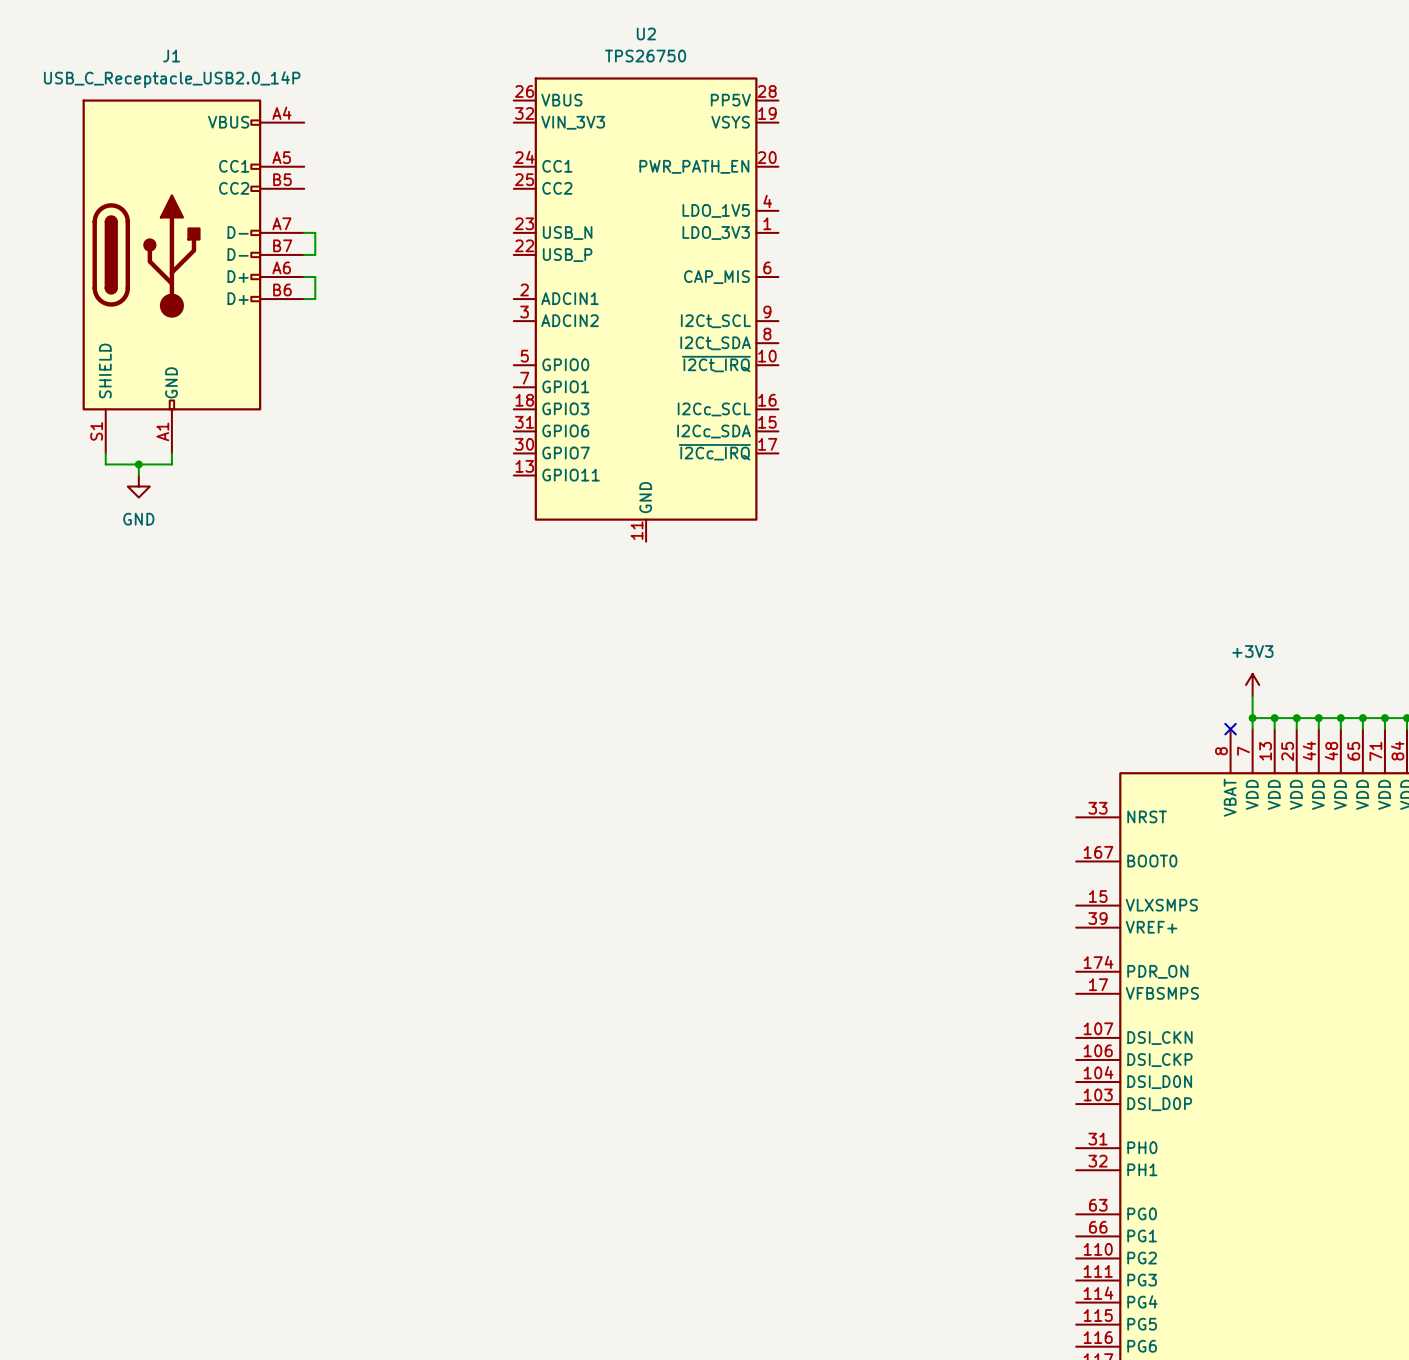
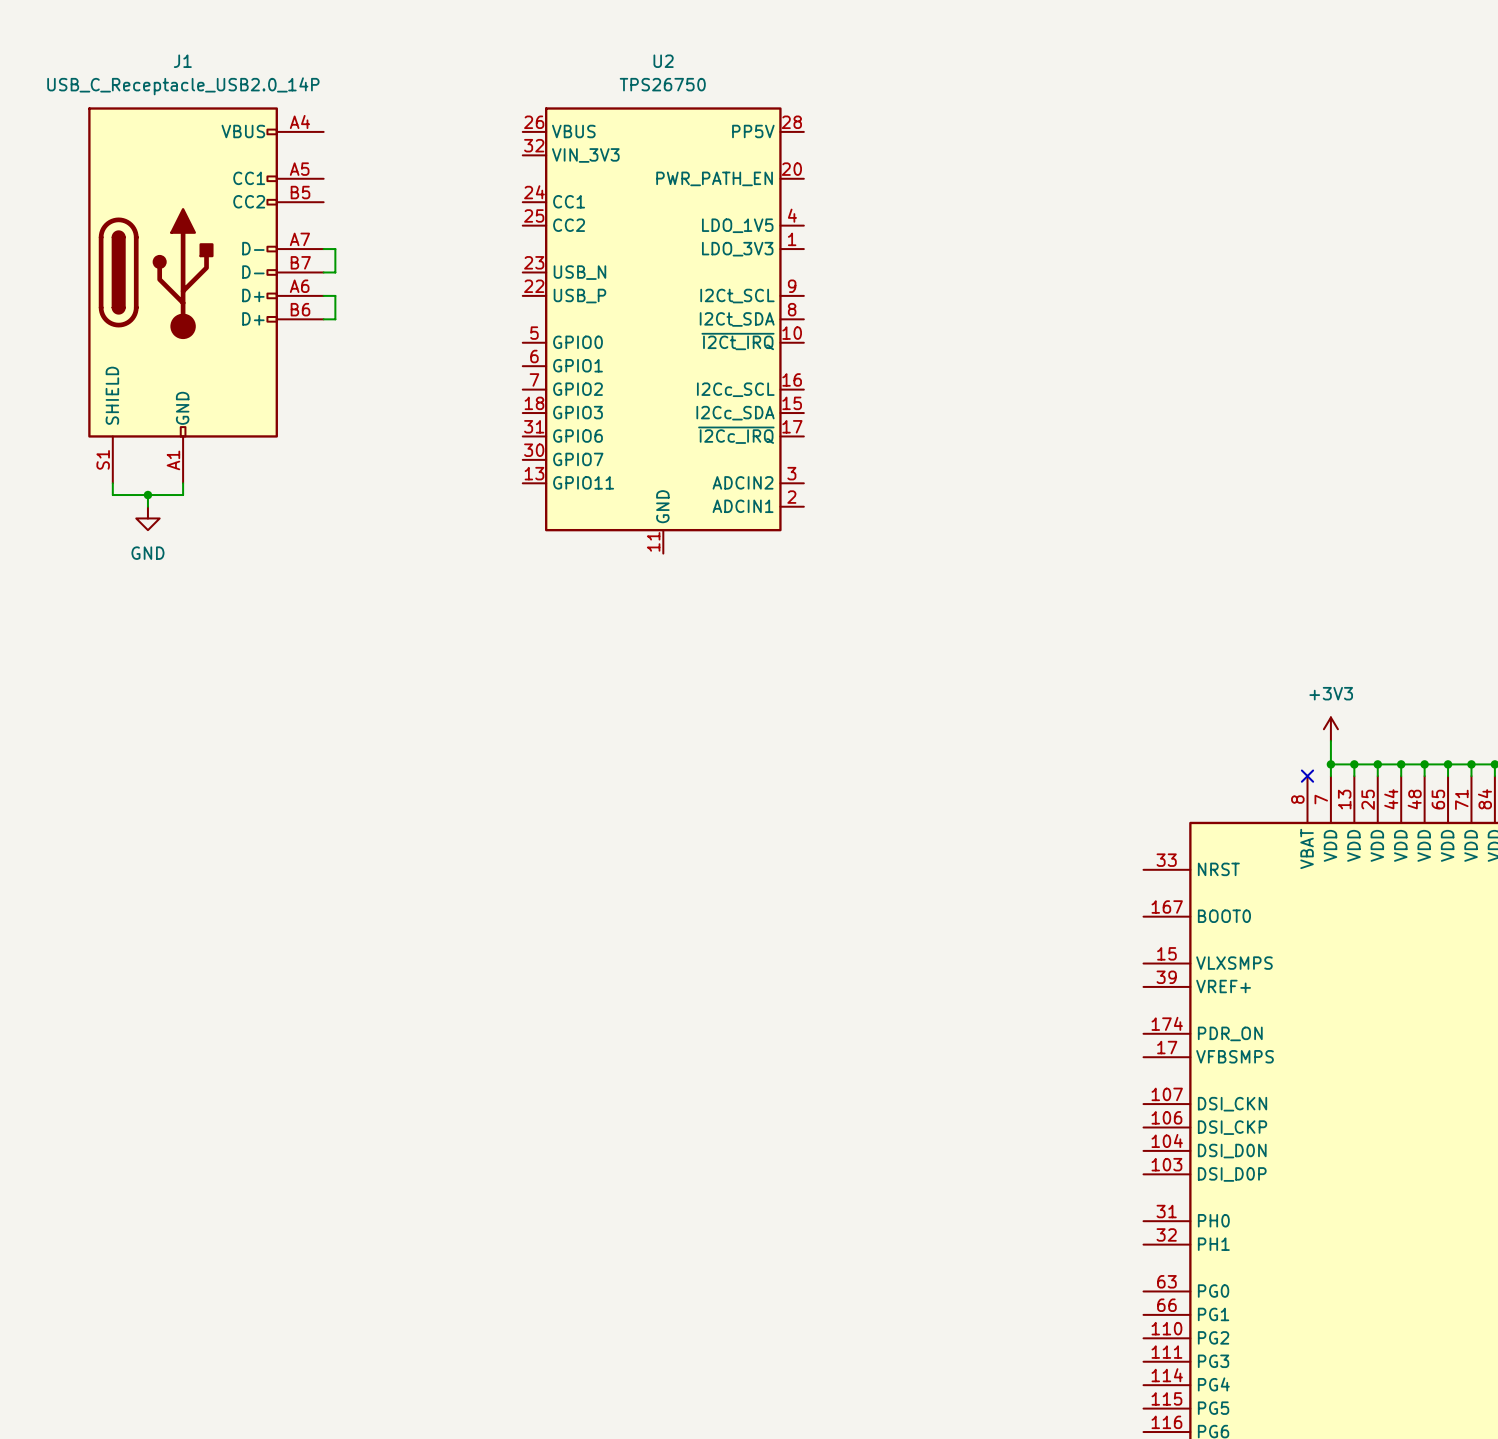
U2 name position: U2 (646, 33) -> U2 (663, 61)
U2 value position: TPS26750 (645, 56) -> TPS26750 (662, 84)
U2 symbol: [513, 77, 779, 542] -> [522, 107, 804, 554]

